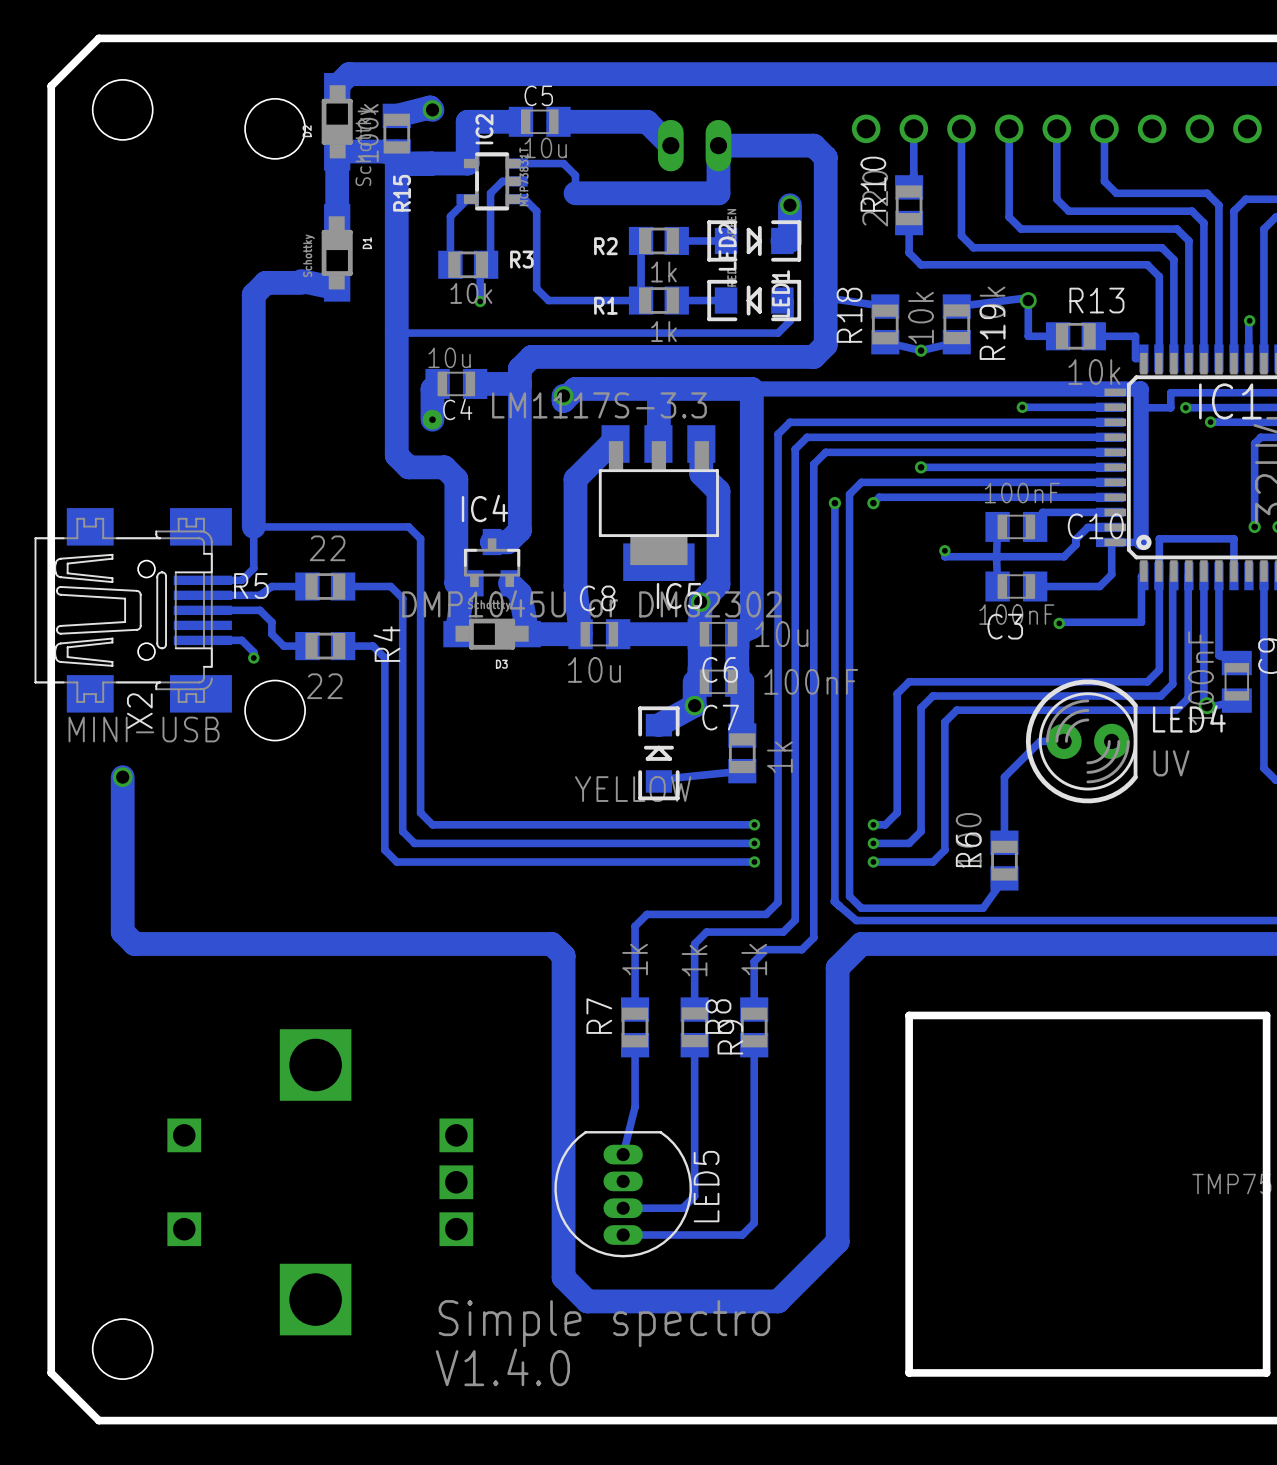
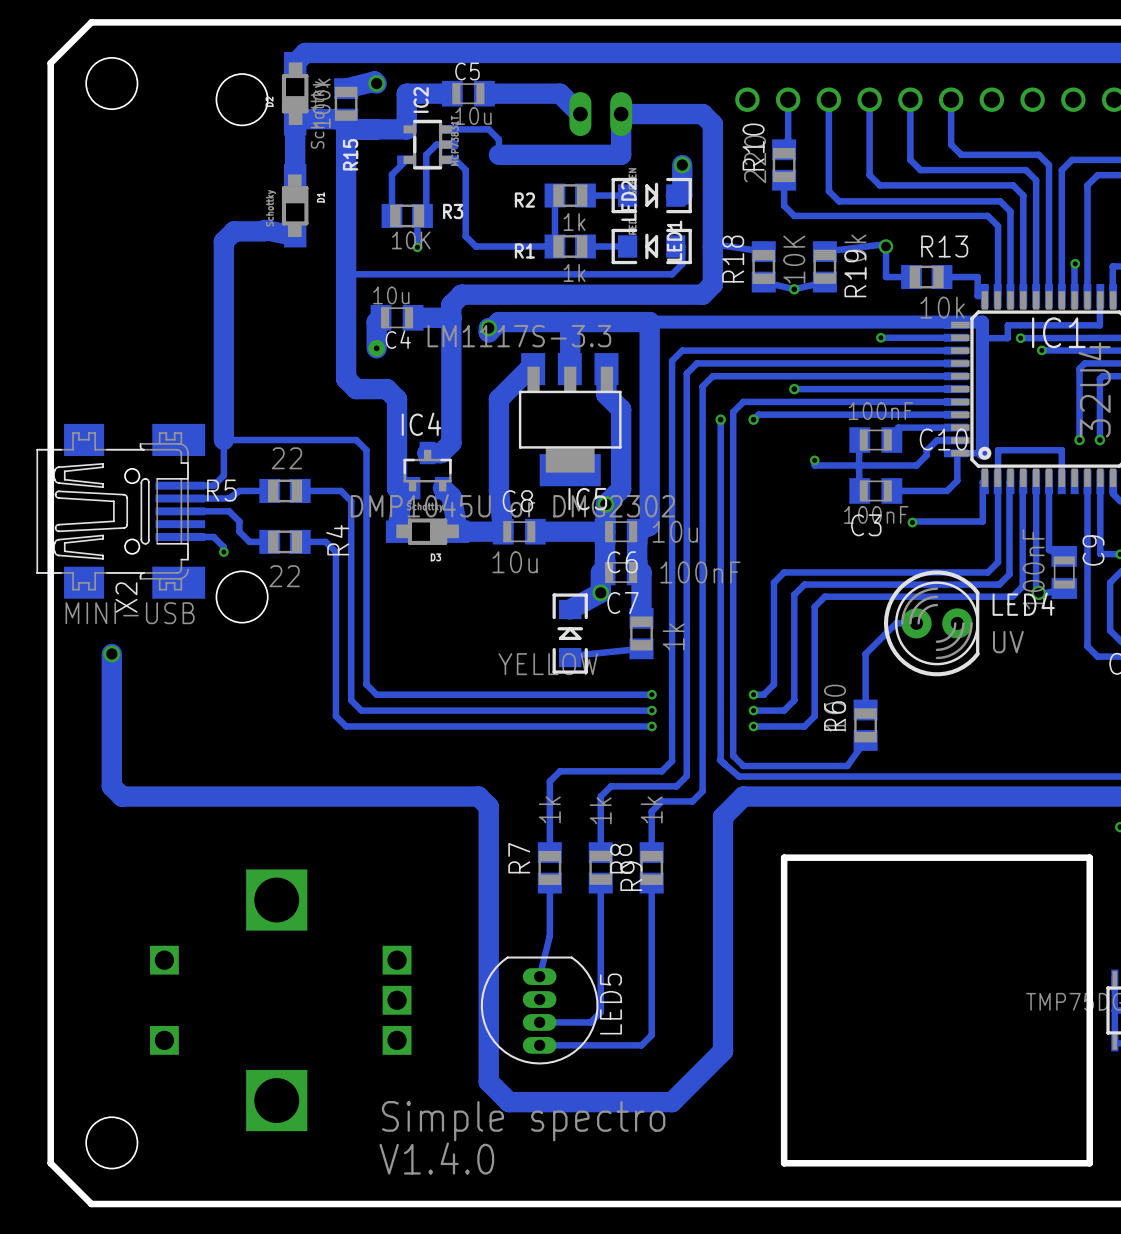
R3 value: 10k (471, 293) -> 10K (411, 240)
R18 value: 10k (921, 317) -> 10K (794, 259)

